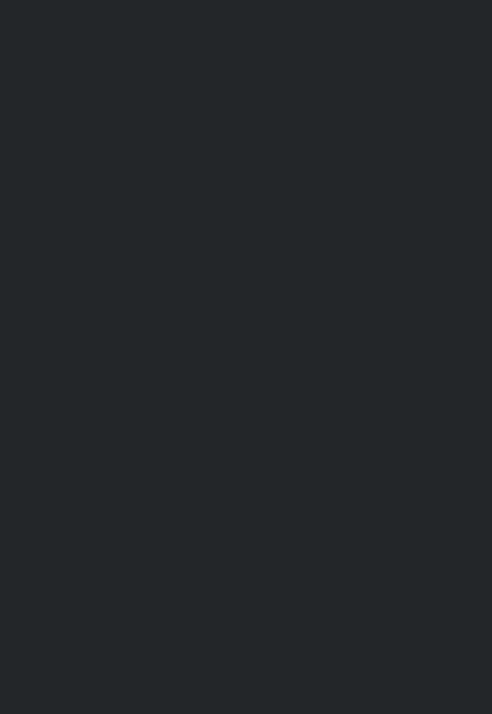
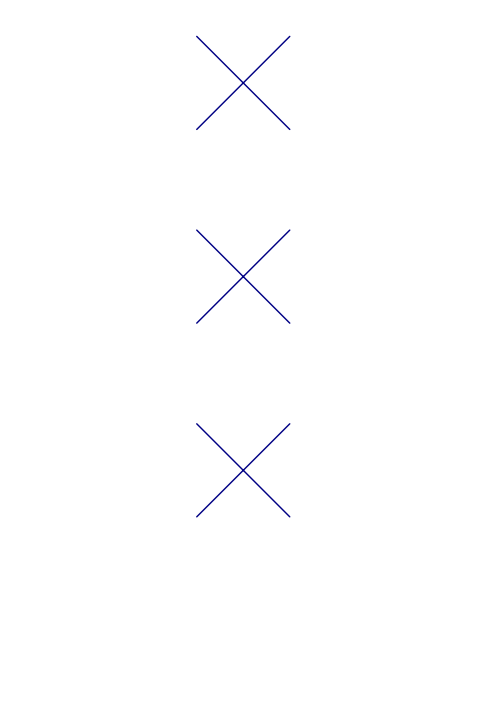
no-connect mark: none -> (243, 82)
no-connect mark: none -> (243, 276)
no-connect mark: none -> (243, 470)

